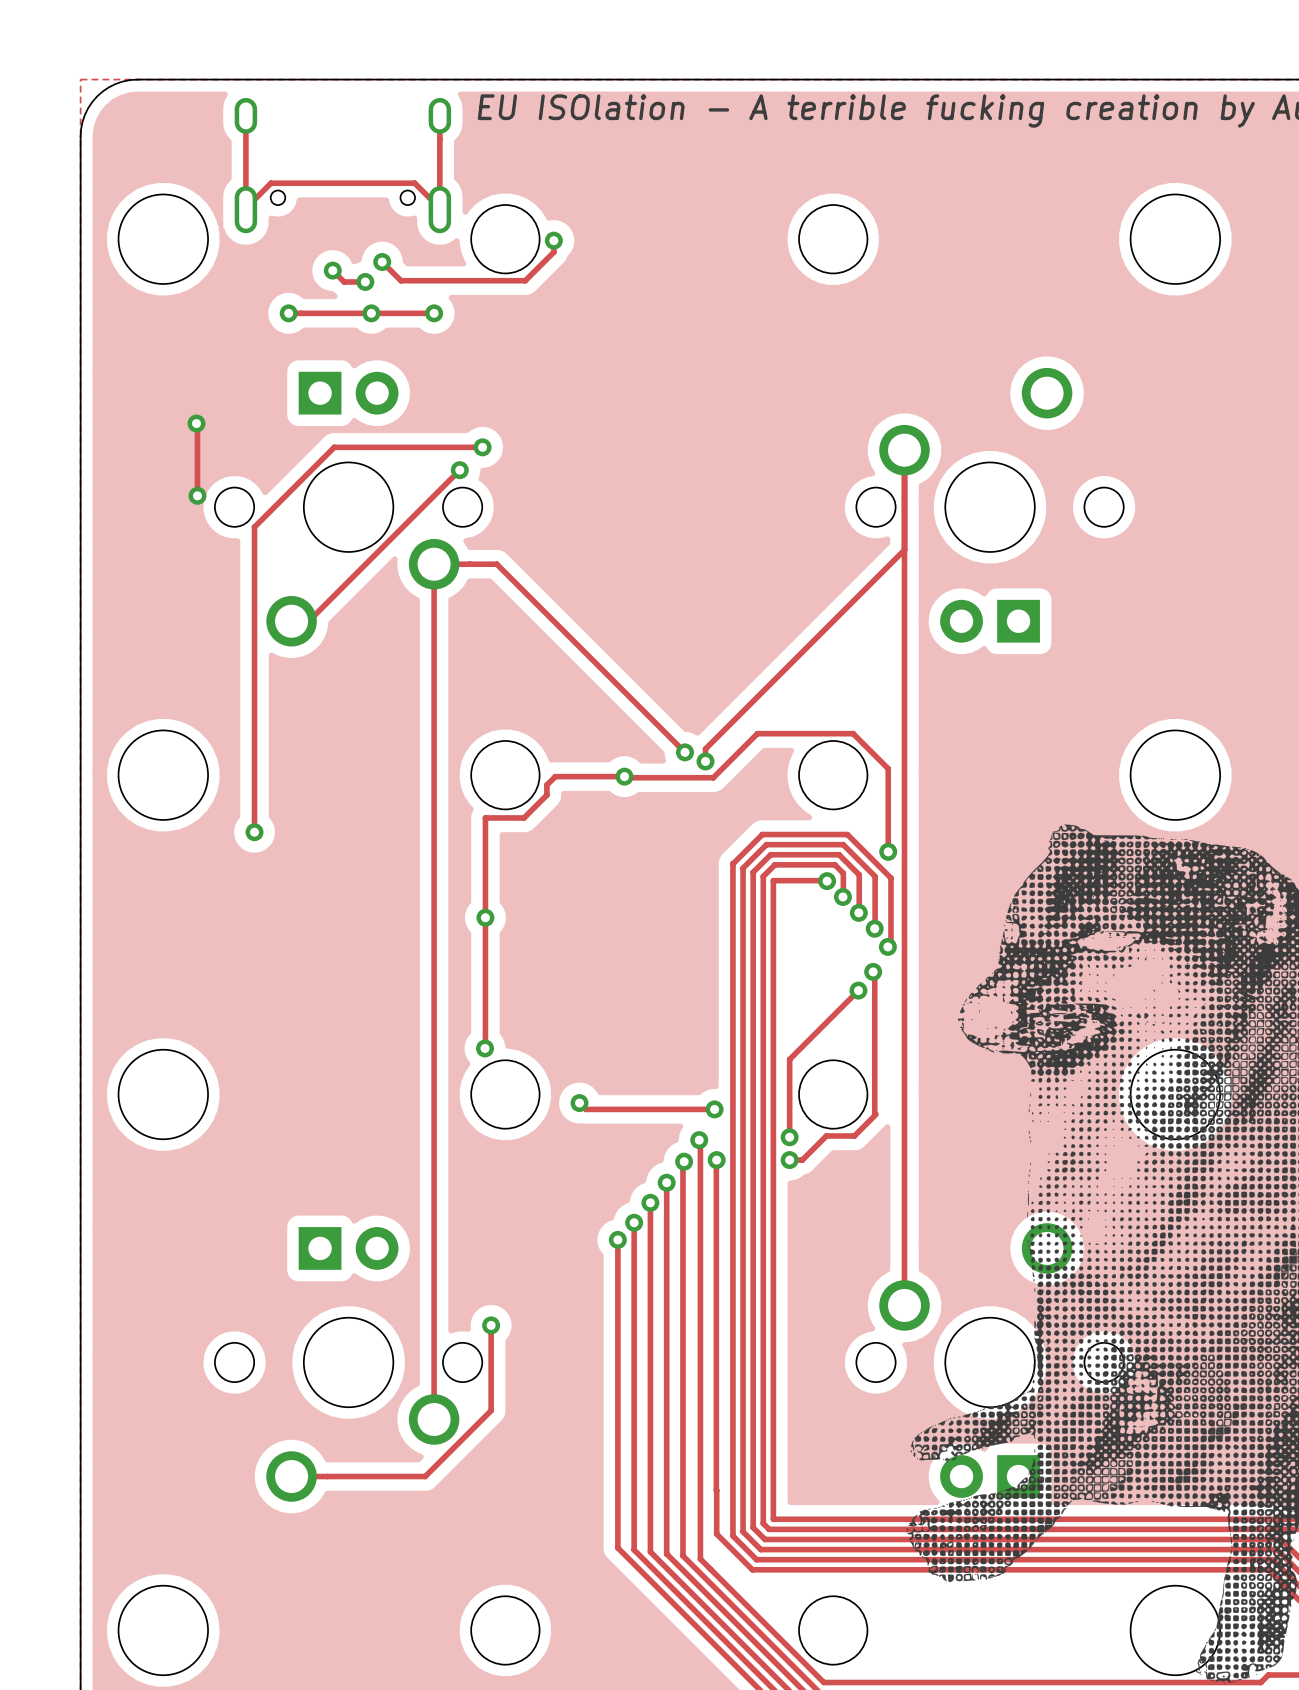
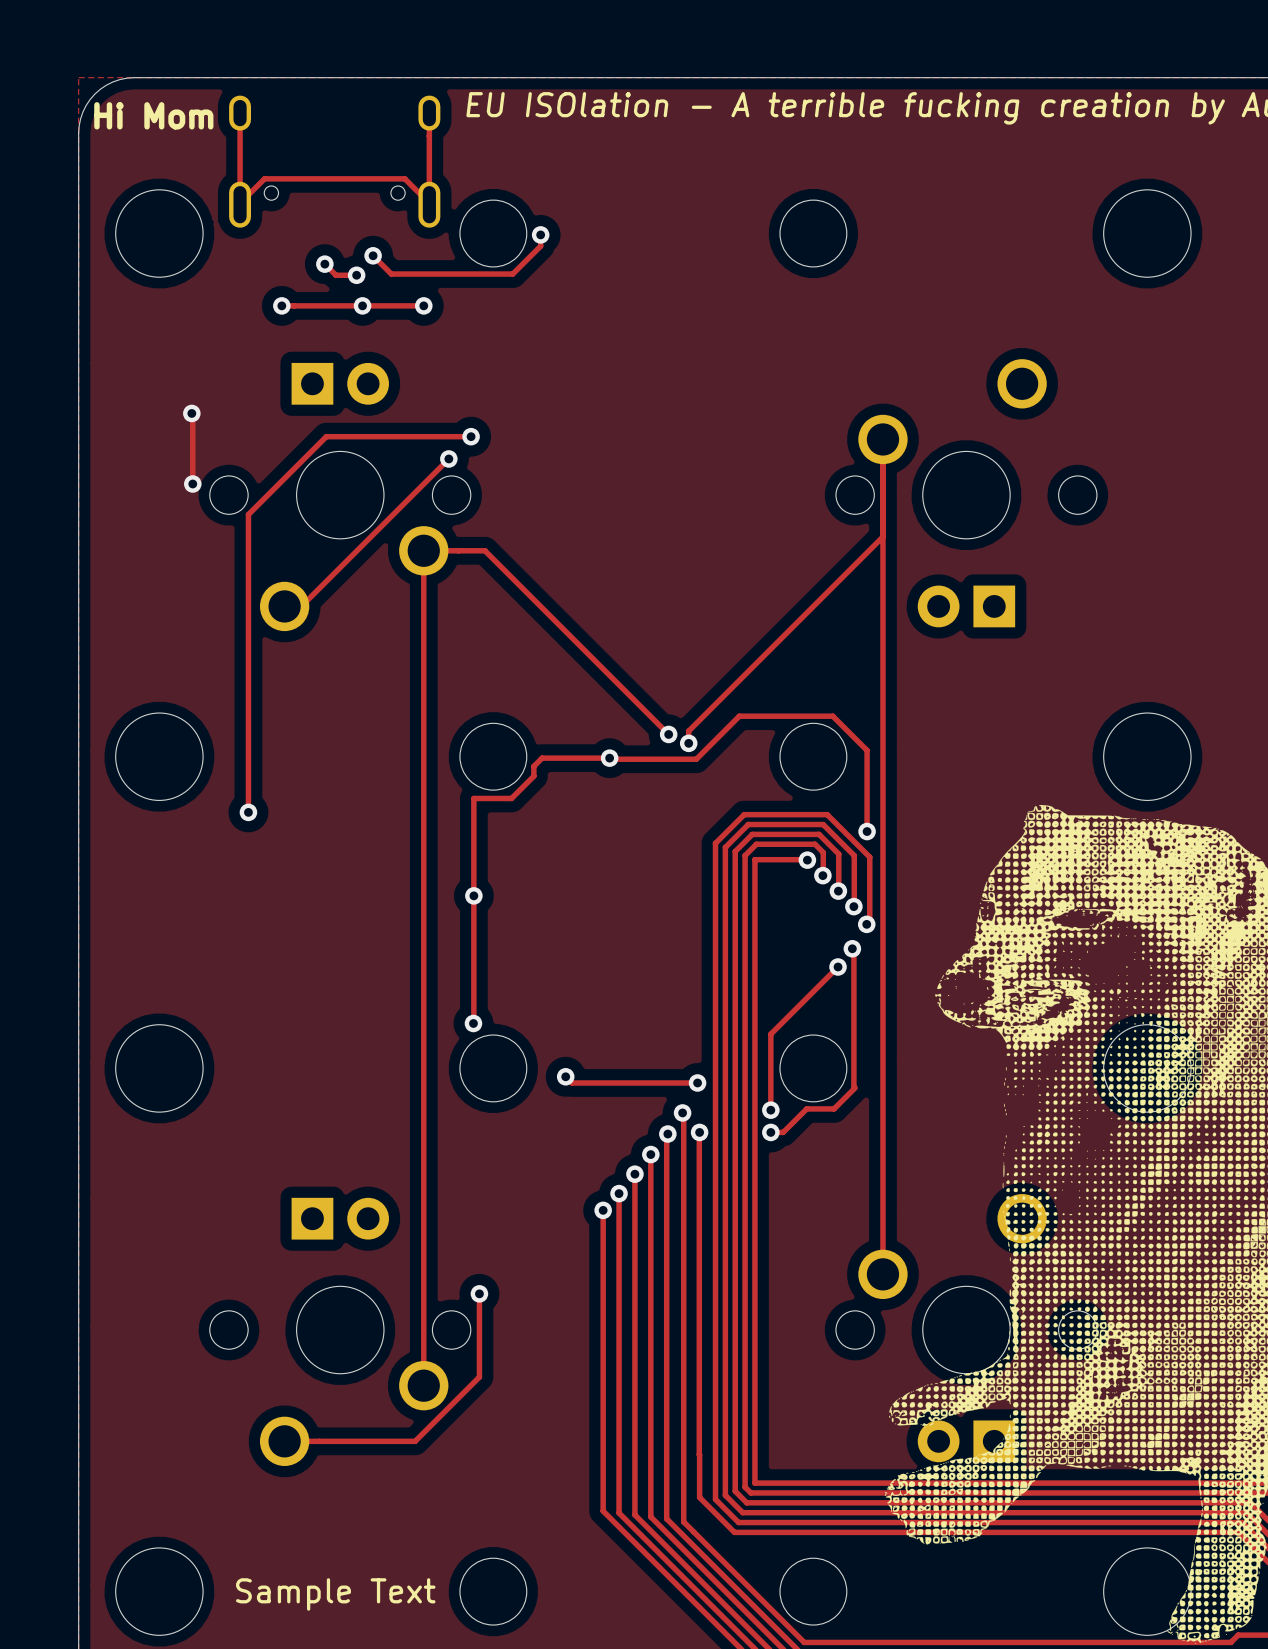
text: none -> Hi Mom (153, 115)
text: none -> Sample Text (335, 1594)

